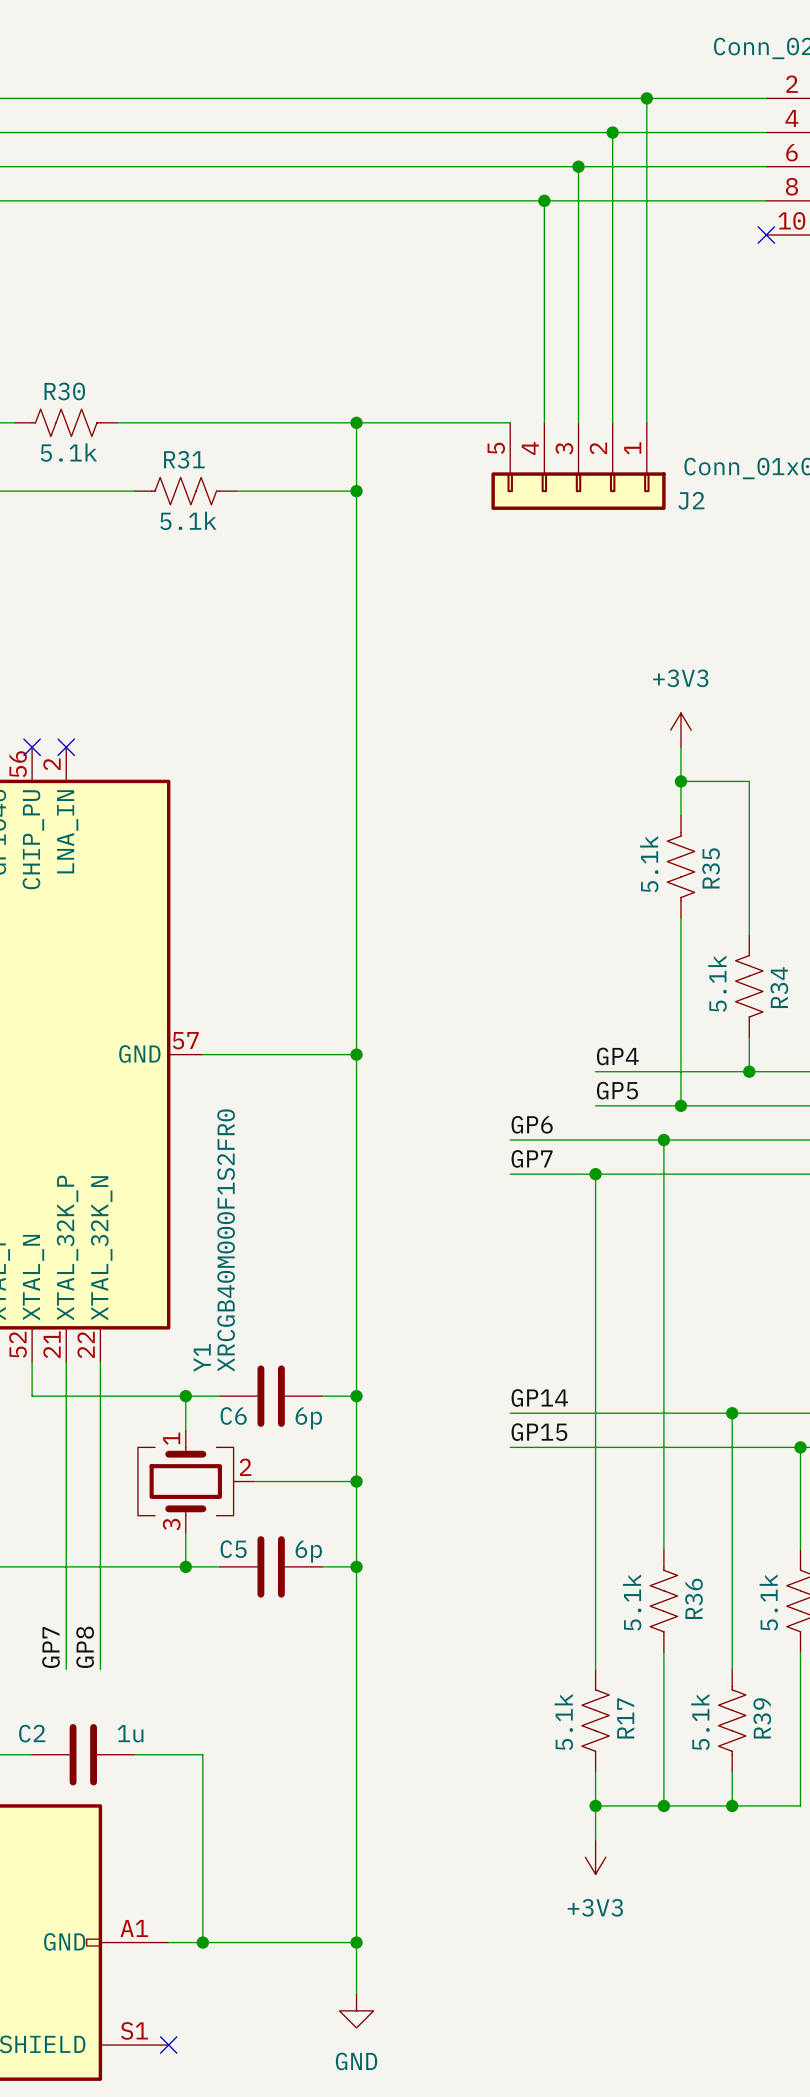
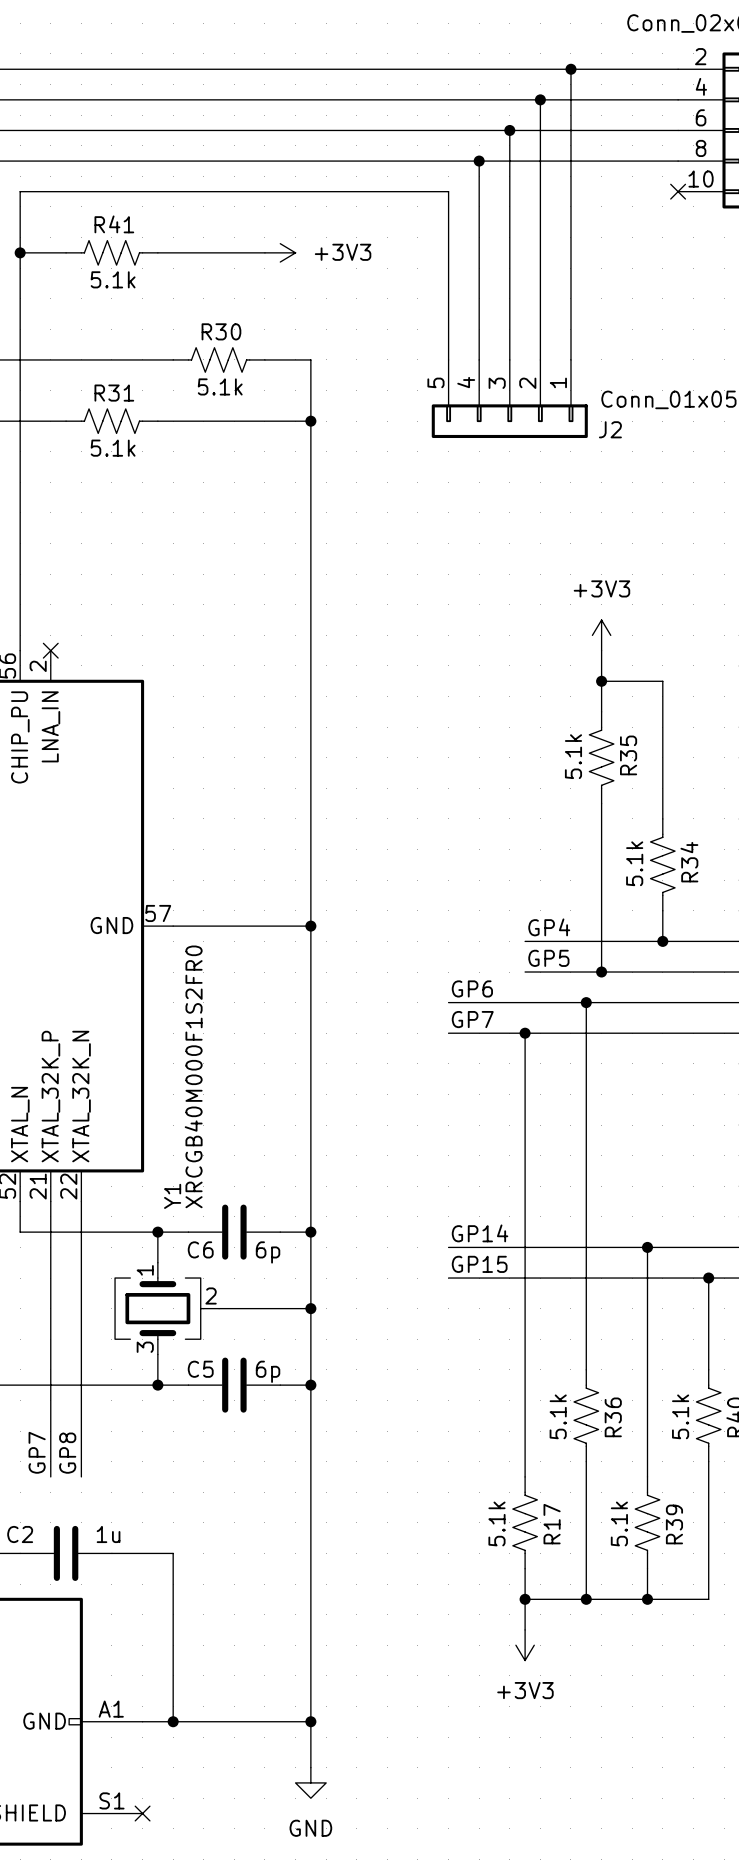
wire: none -> (20, 252) (66, 252)
junction: none -> (20, 252)
R41: none -> 5.1k (111, 252)
wire: none -> (157, 252) (264, 252)
power symbol: none -> +3V3 (280, 252)
R30 position: (66, 422) -> (219, 359)
wire: (202, 422) (305, 422) -> (4, 359) (96, 359)
wire: (356, 422) (510, 422) -> (20, 650) (20, 191) (448, 191) (448, 359)
junction: (356, 422) -> none
wire: (83, 491) (134, 491) -> (157, 421) (203, 421)
R31 position: (185, 491) -> (111, 421)
no-connect mark: (32, 747) -> none

